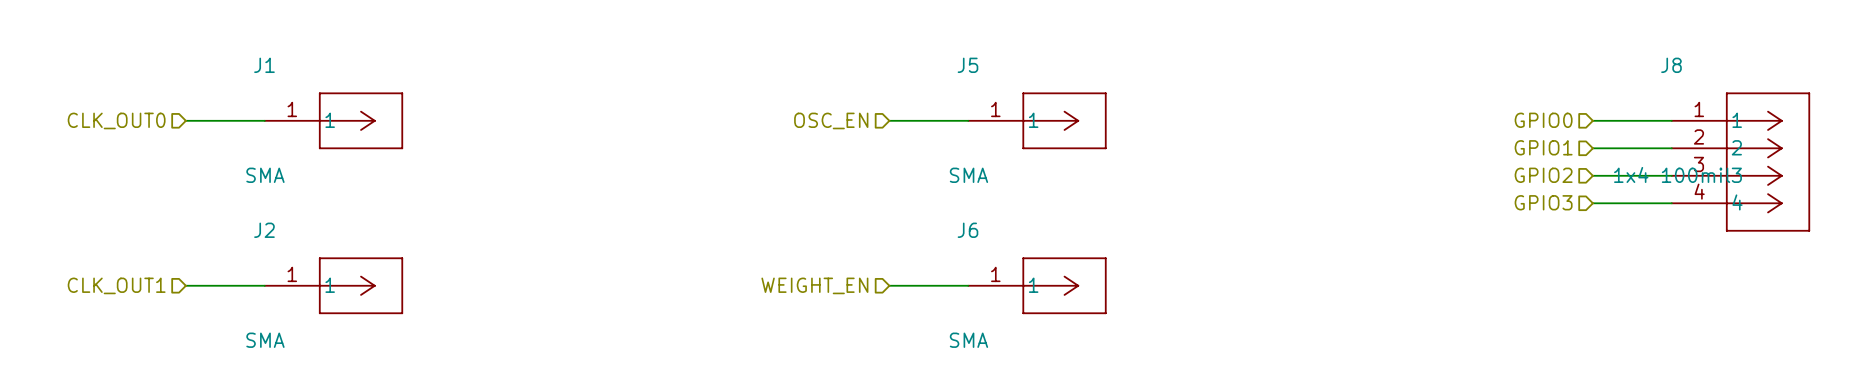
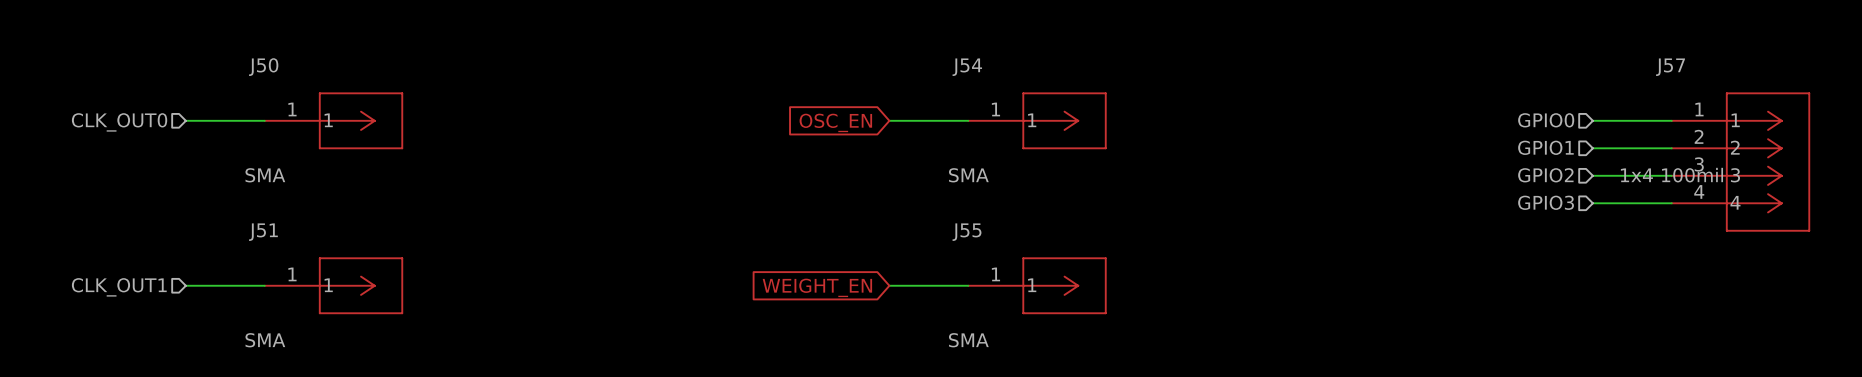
J1 name: J1 (264, 65) -> J50 (263, 67)
J5 name: J5 (967, 65) -> J54 (967, 67)
J8 name: J8 (1671, 65) -> J57 (1670, 67)
hierarchical label: OSC_EN (831, 120) -> none
global label: none -> OSC_EN (835, 122)
J2 name: J2 (264, 230) -> J51 (263, 232)
J6 name: J6 (967, 230) -> J55 (967, 232)
hierarchical label: WEIGHT_EN (814, 285) -> none
global label: none -> WEIGHT_EN (817, 287)

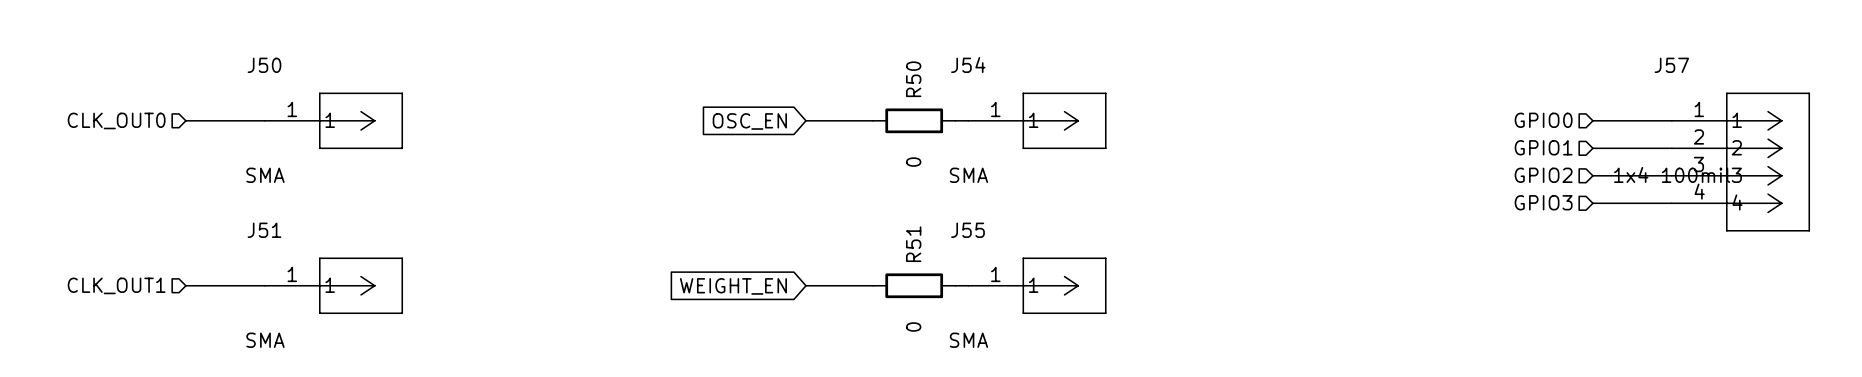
wire: none -> (805, 120) (872, 120)
wire: (889, 120) (955, 120) -> none
R50: none -> 0 (914, 120)
global label position: OSC_EN (835, 122) -> OSC_EN (749, 121)
wire: none -> (805, 285) (872, 285)
wire: (889, 285) (955, 285) -> none
R51: none -> 0 (914, 285)
global label position: WEIGHT_EN (817, 287) -> WEIGHT_EN (733, 286)

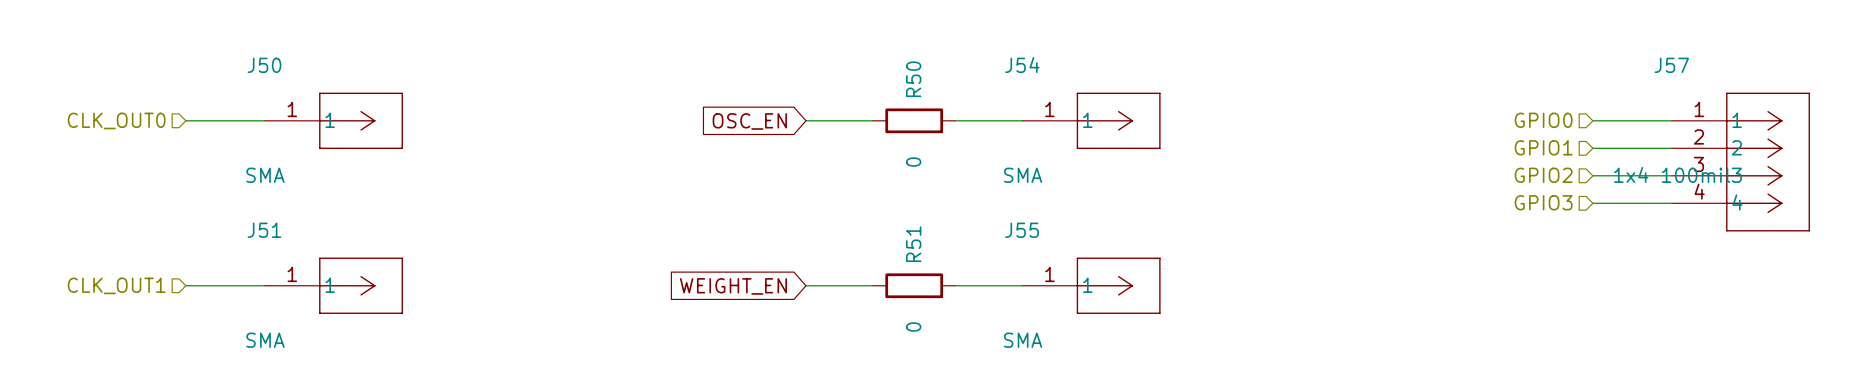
J54 position: (1037, 120) -> (1091, 120)
J55 position: (1037, 285) -> (1091, 285)

